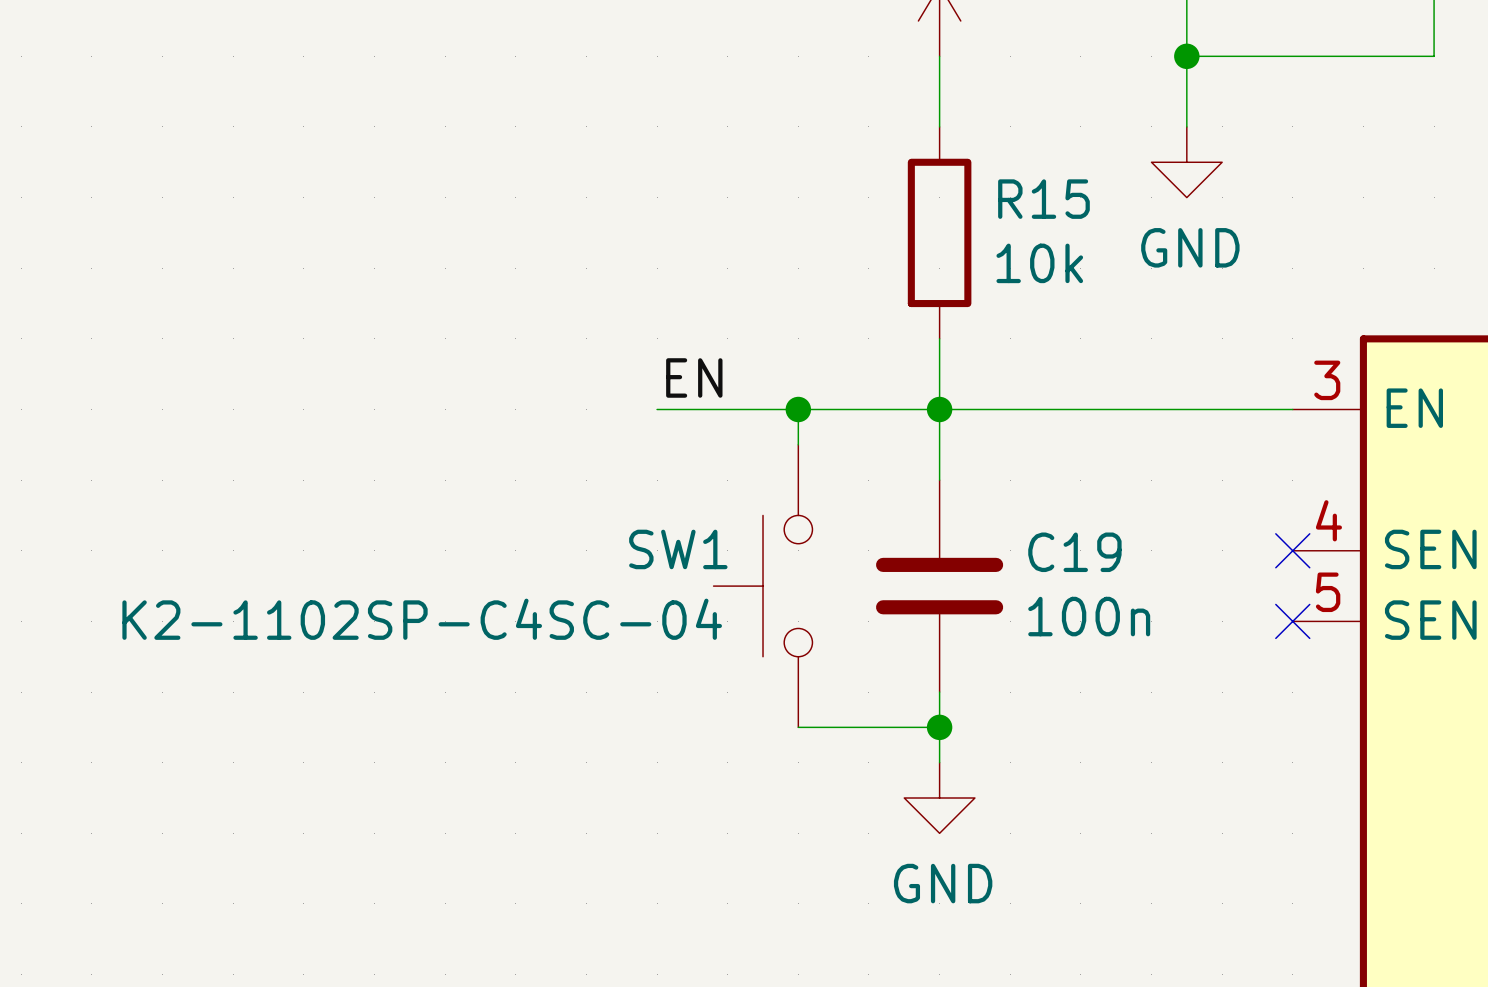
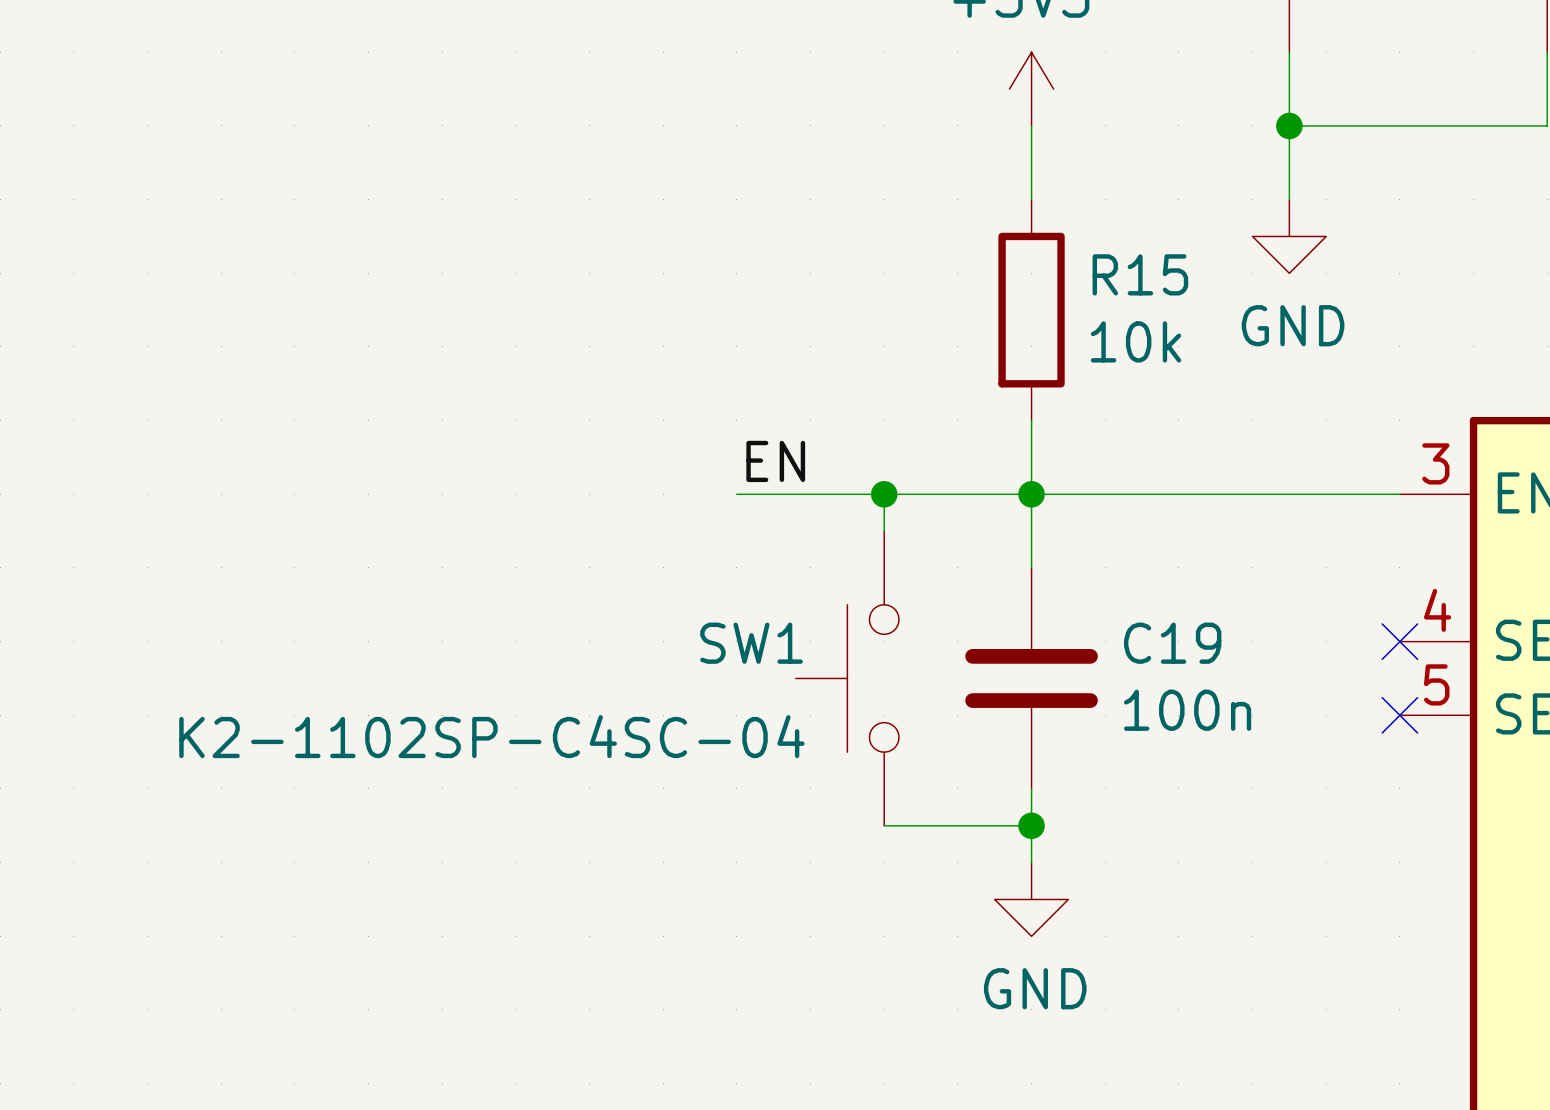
SW1 name position: SW1 (678, 549) -> SW1 (751, 643)
SW1 value position: K2-1102SP-C4SC-04 (422, 619) -> K2-1102SP-C4SC-04 (491, 736)

